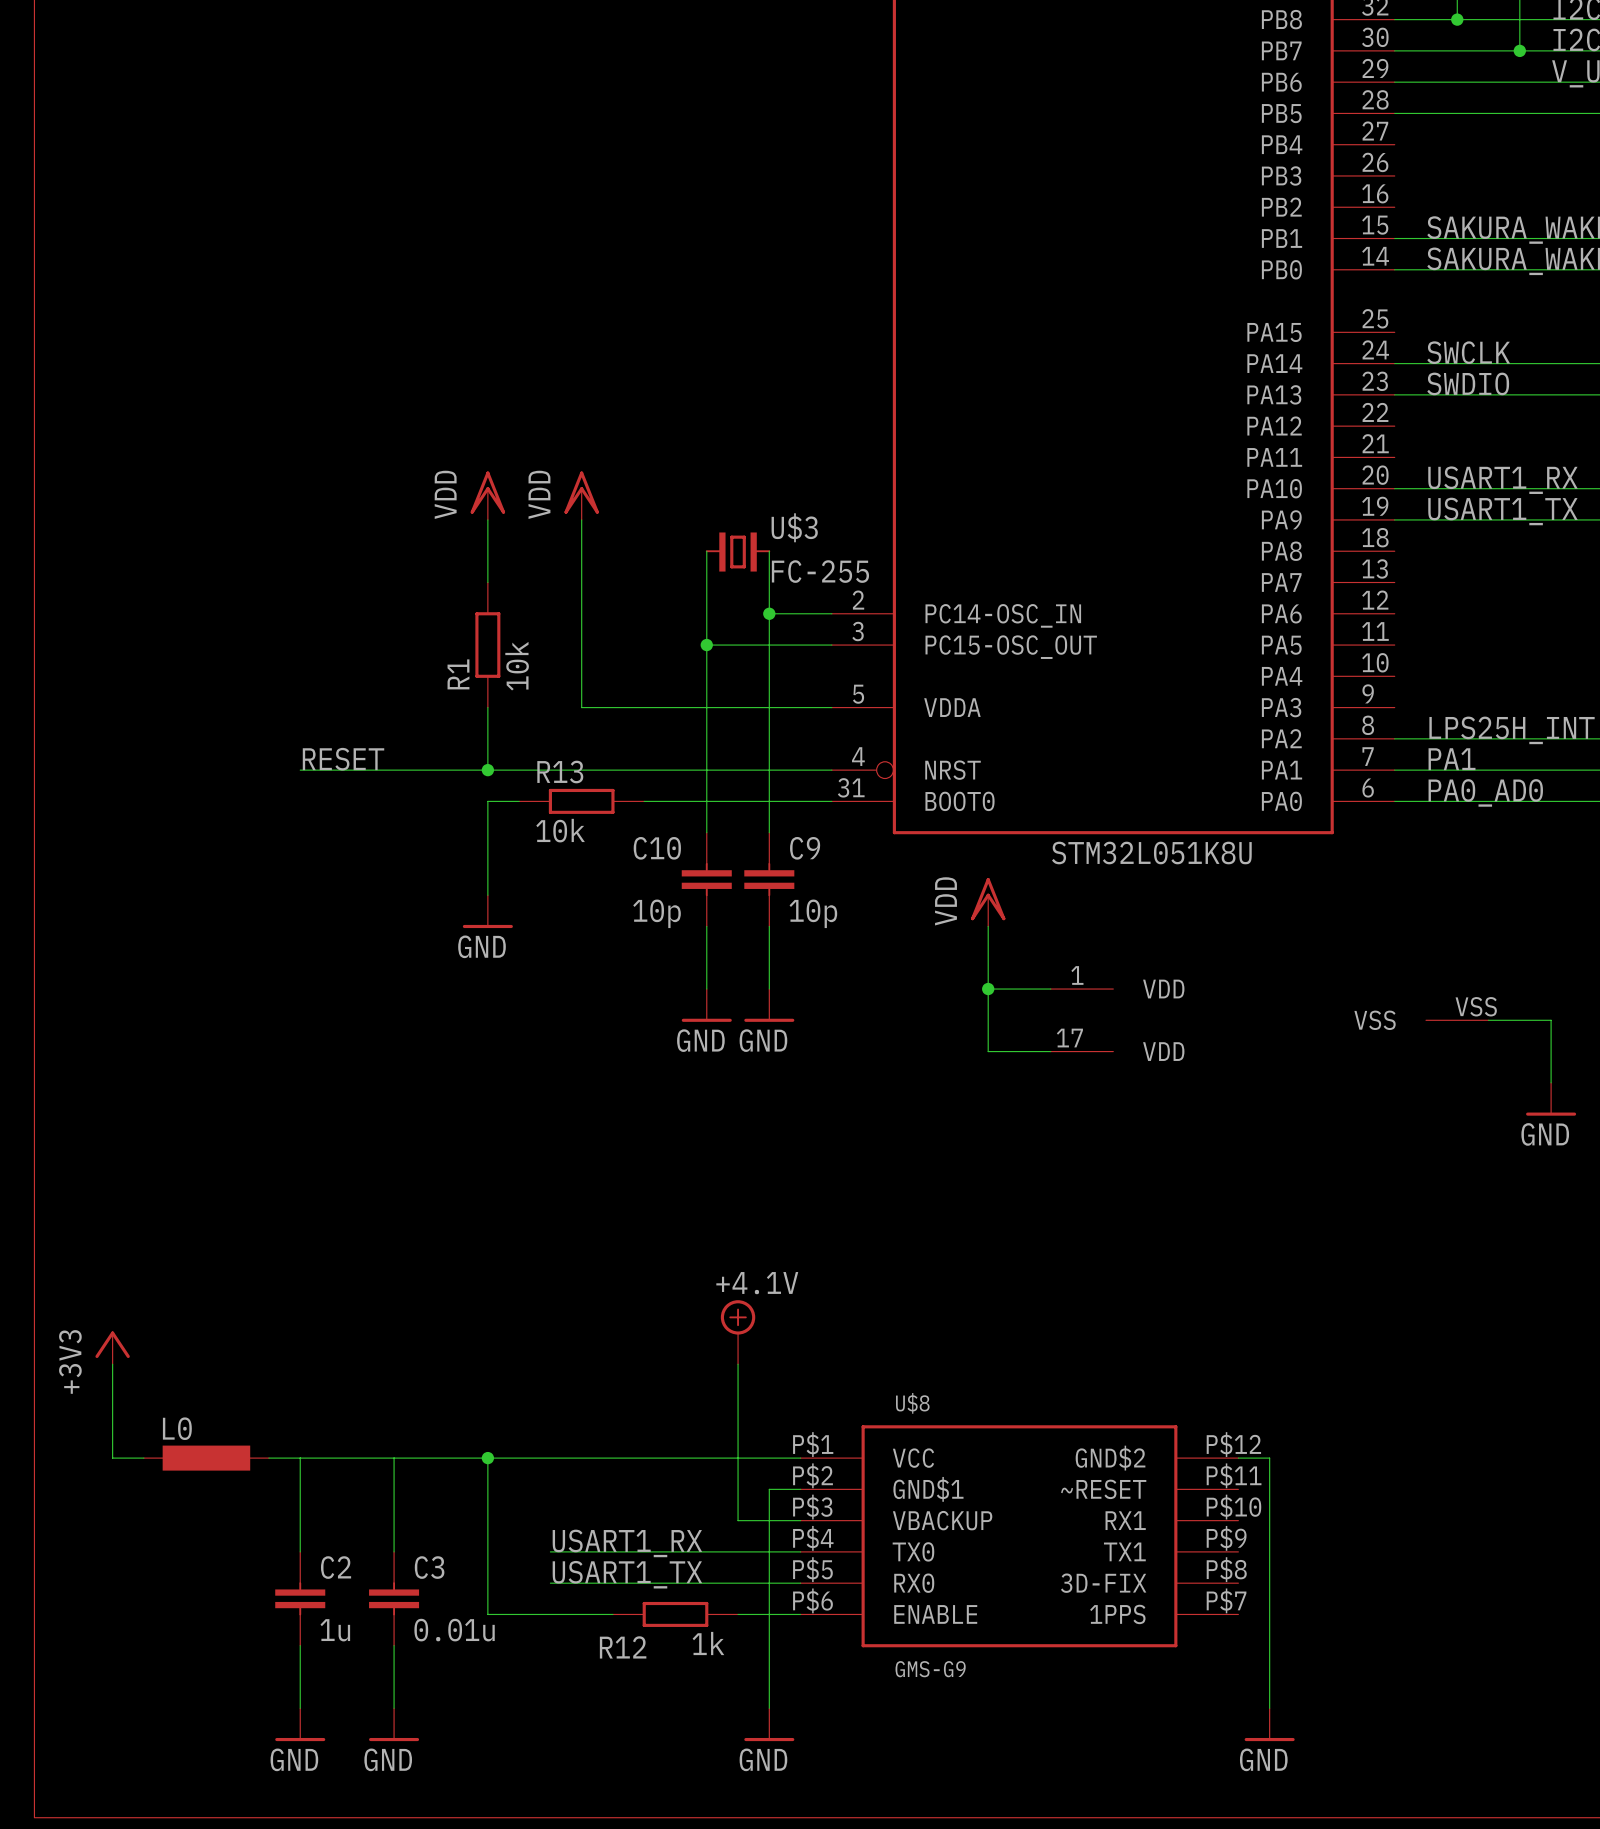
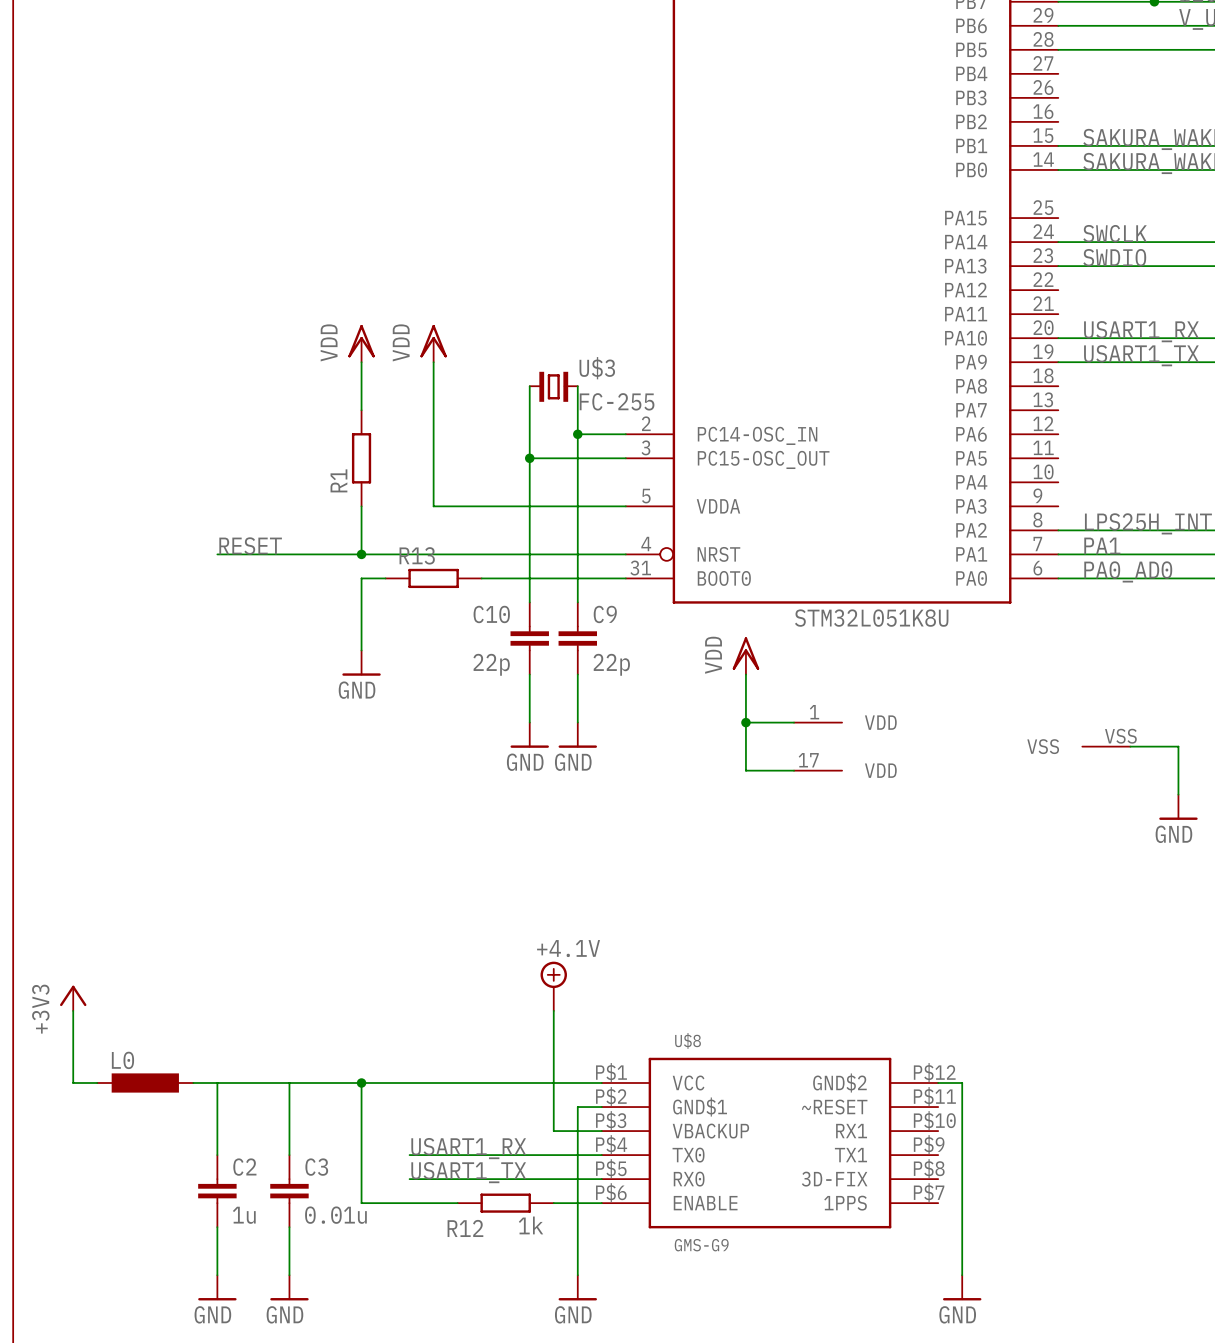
R1 value: 10k (517, 666) -> none
R13 value: 10k (560, 830) -> none
C10 value: 10p (657, 913) -> 22p (491, 664)
C9 value: 10p (813, 913) -> 22p (611, 664)

